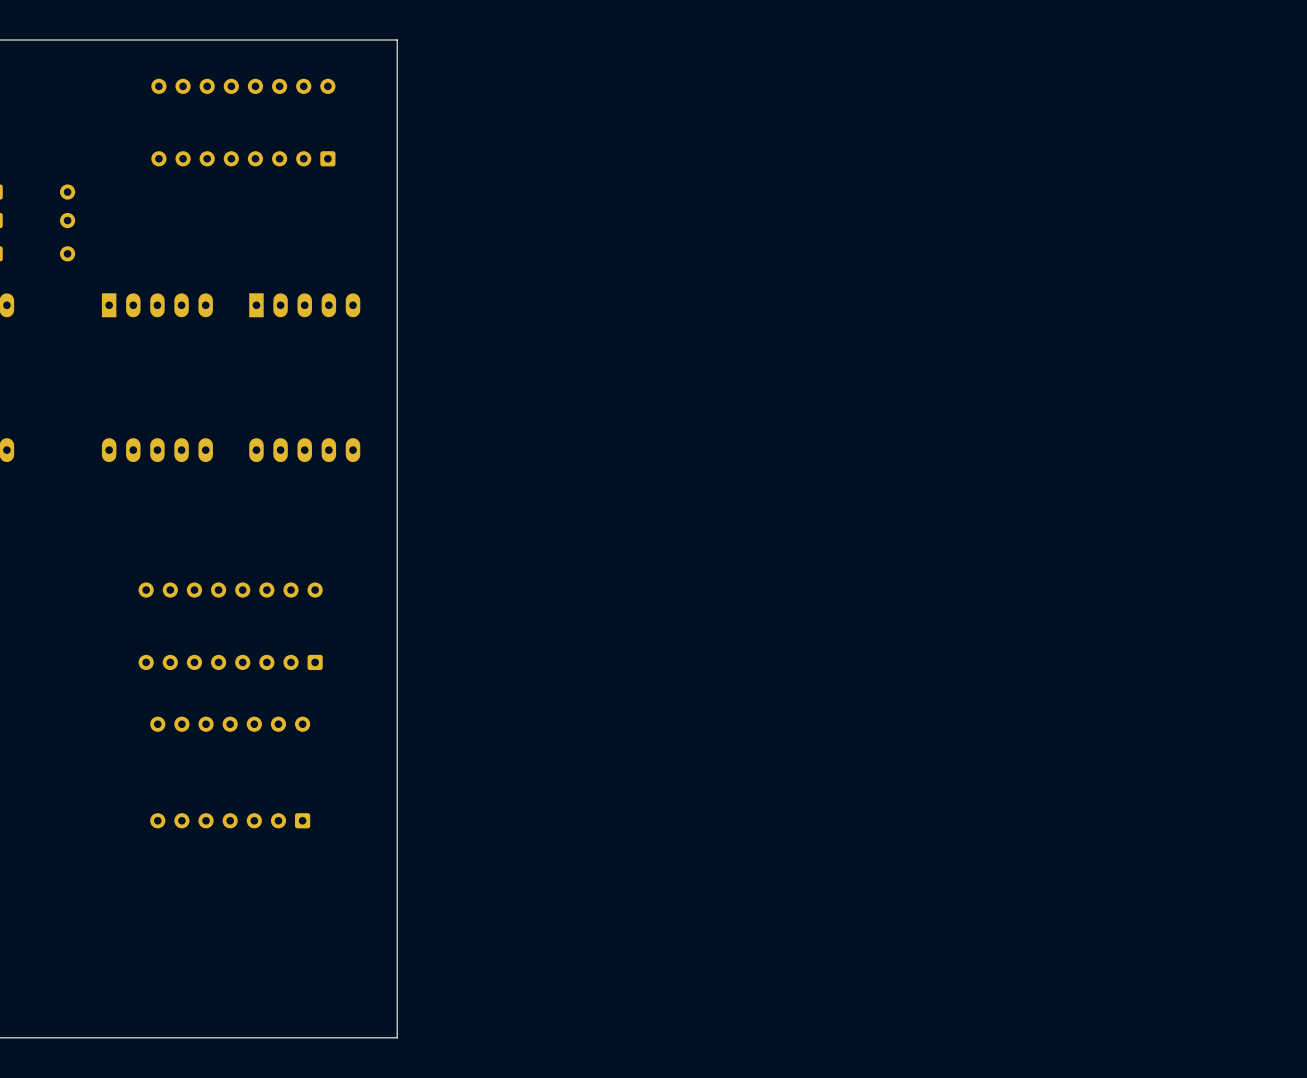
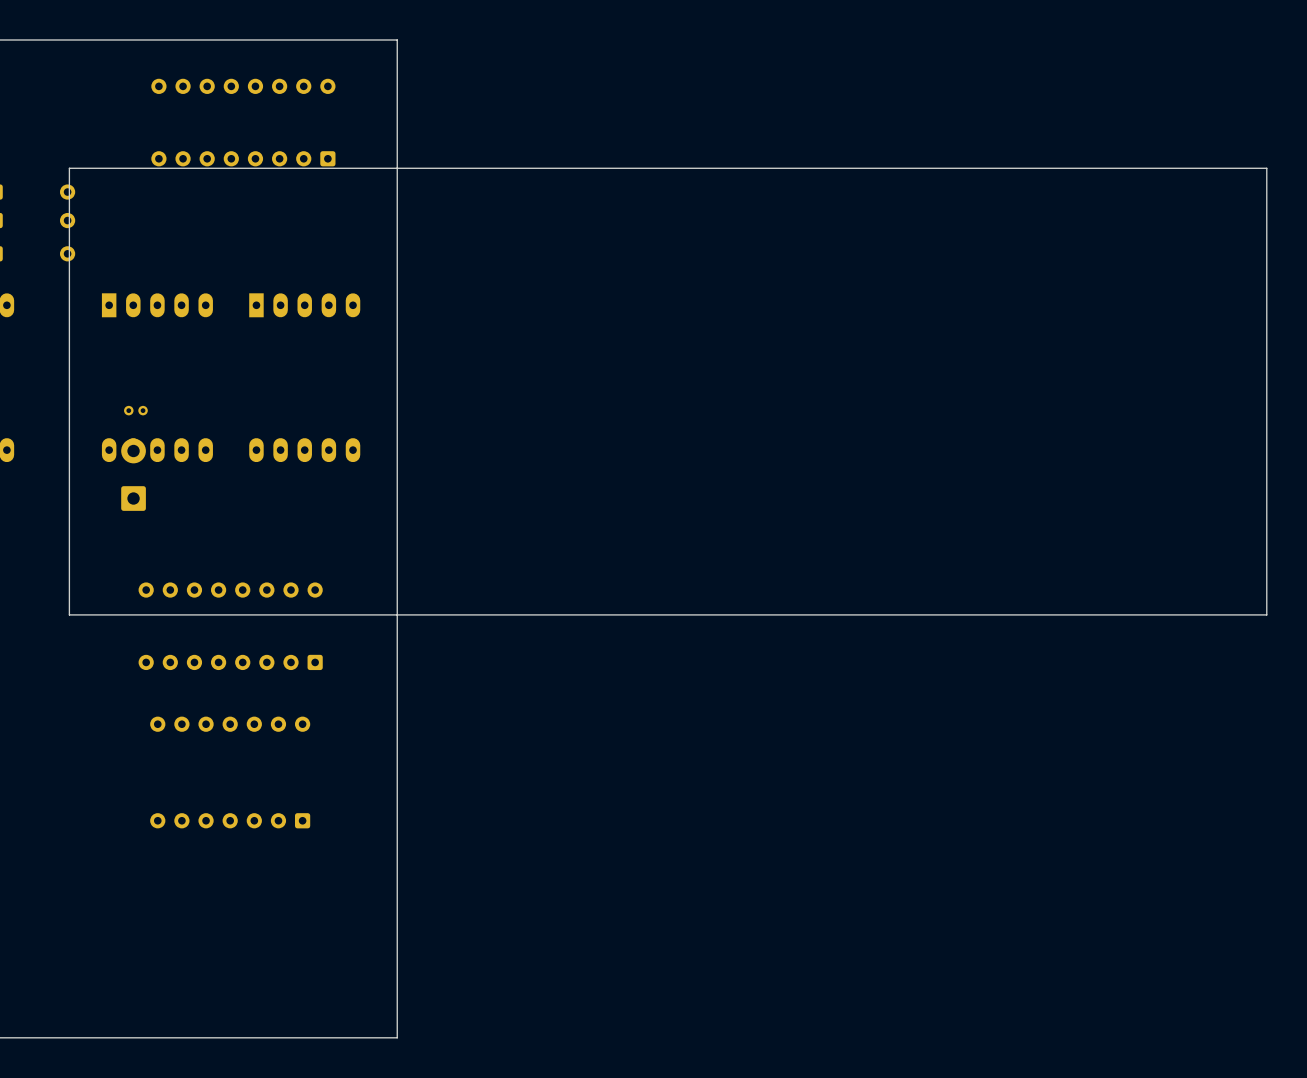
board edge: none -> (1266, 168) (1266, 614) (69, 614) (69, 168) (1266, 168)
part: none -> (135, 410)
part: none -> (133, 474)

